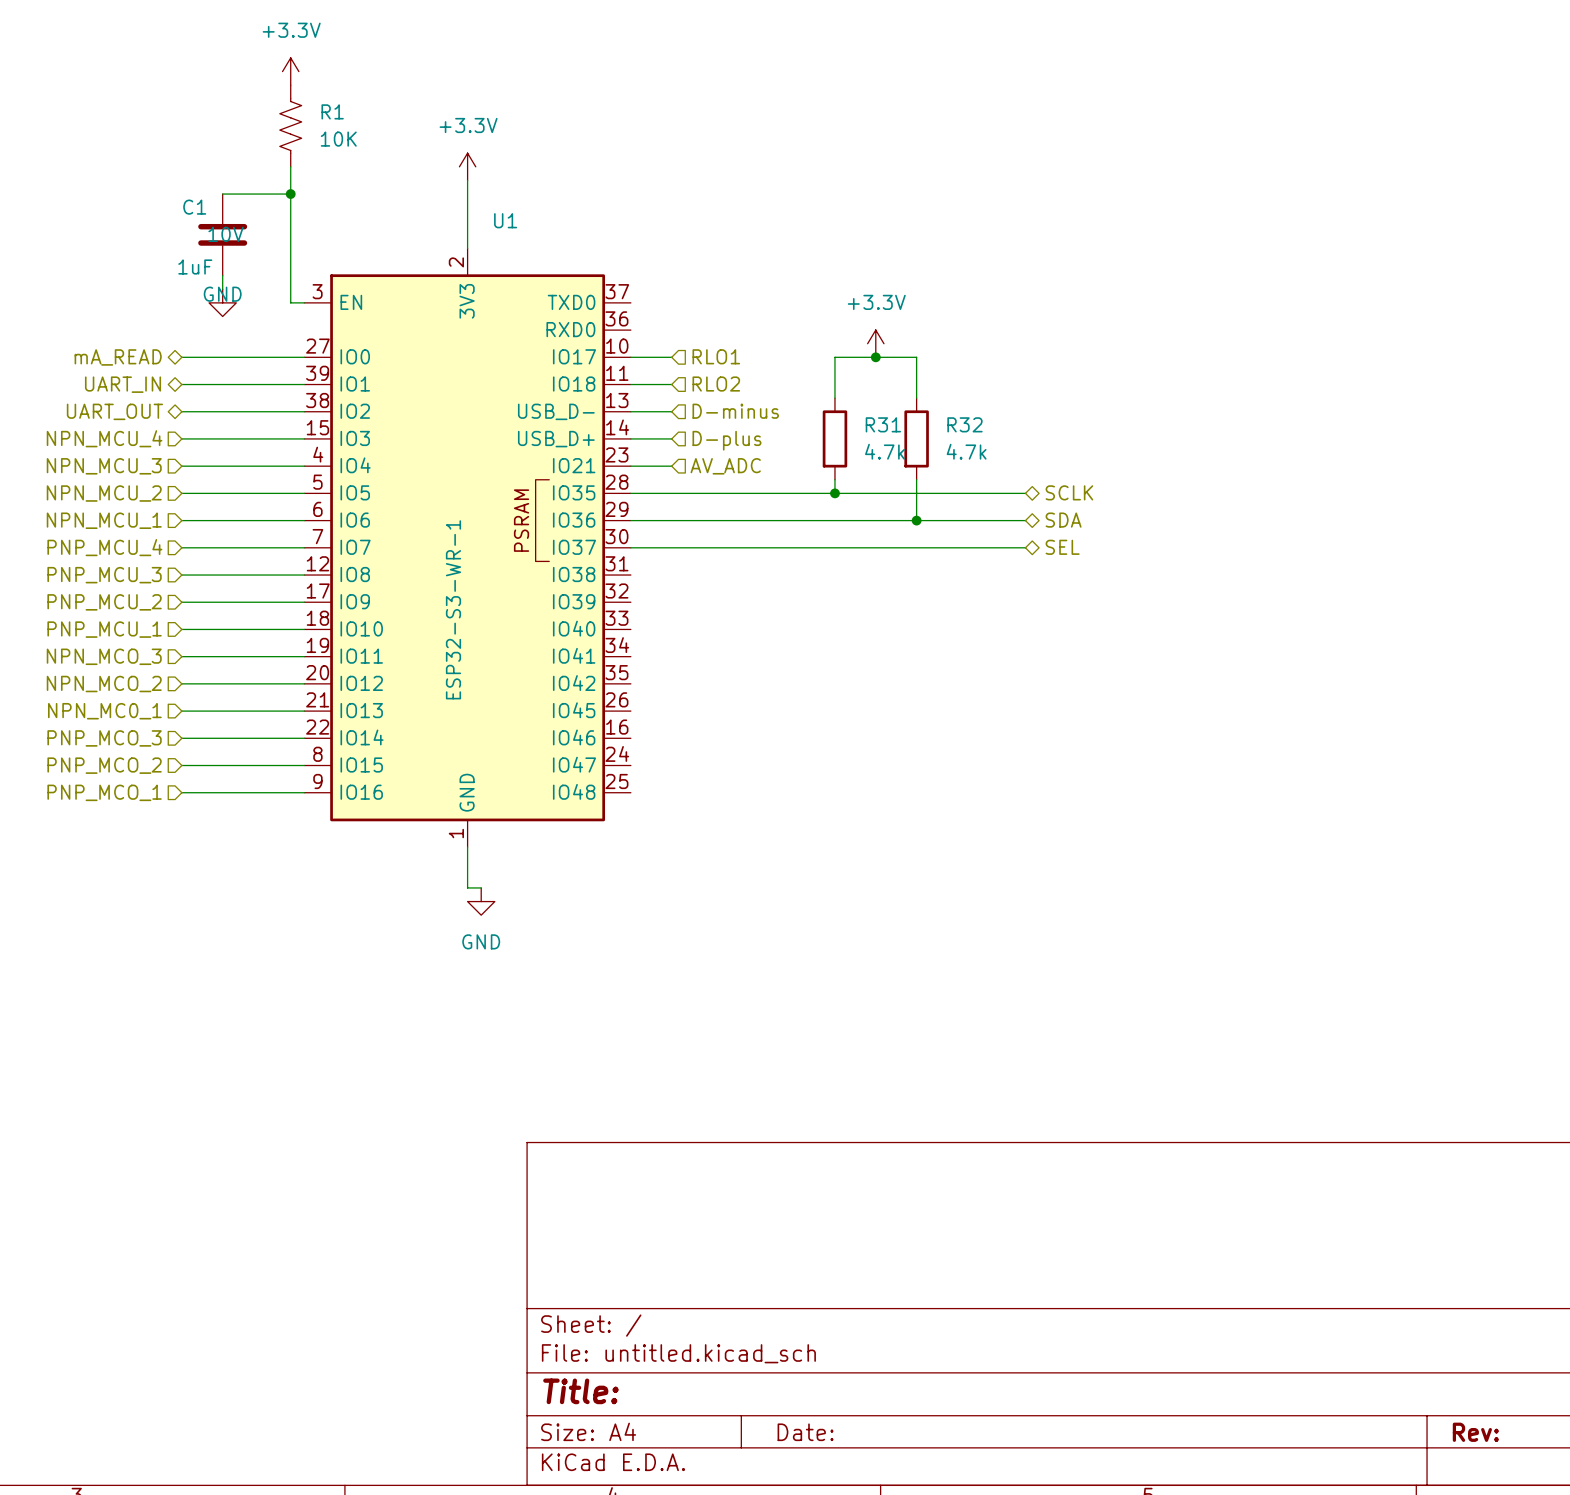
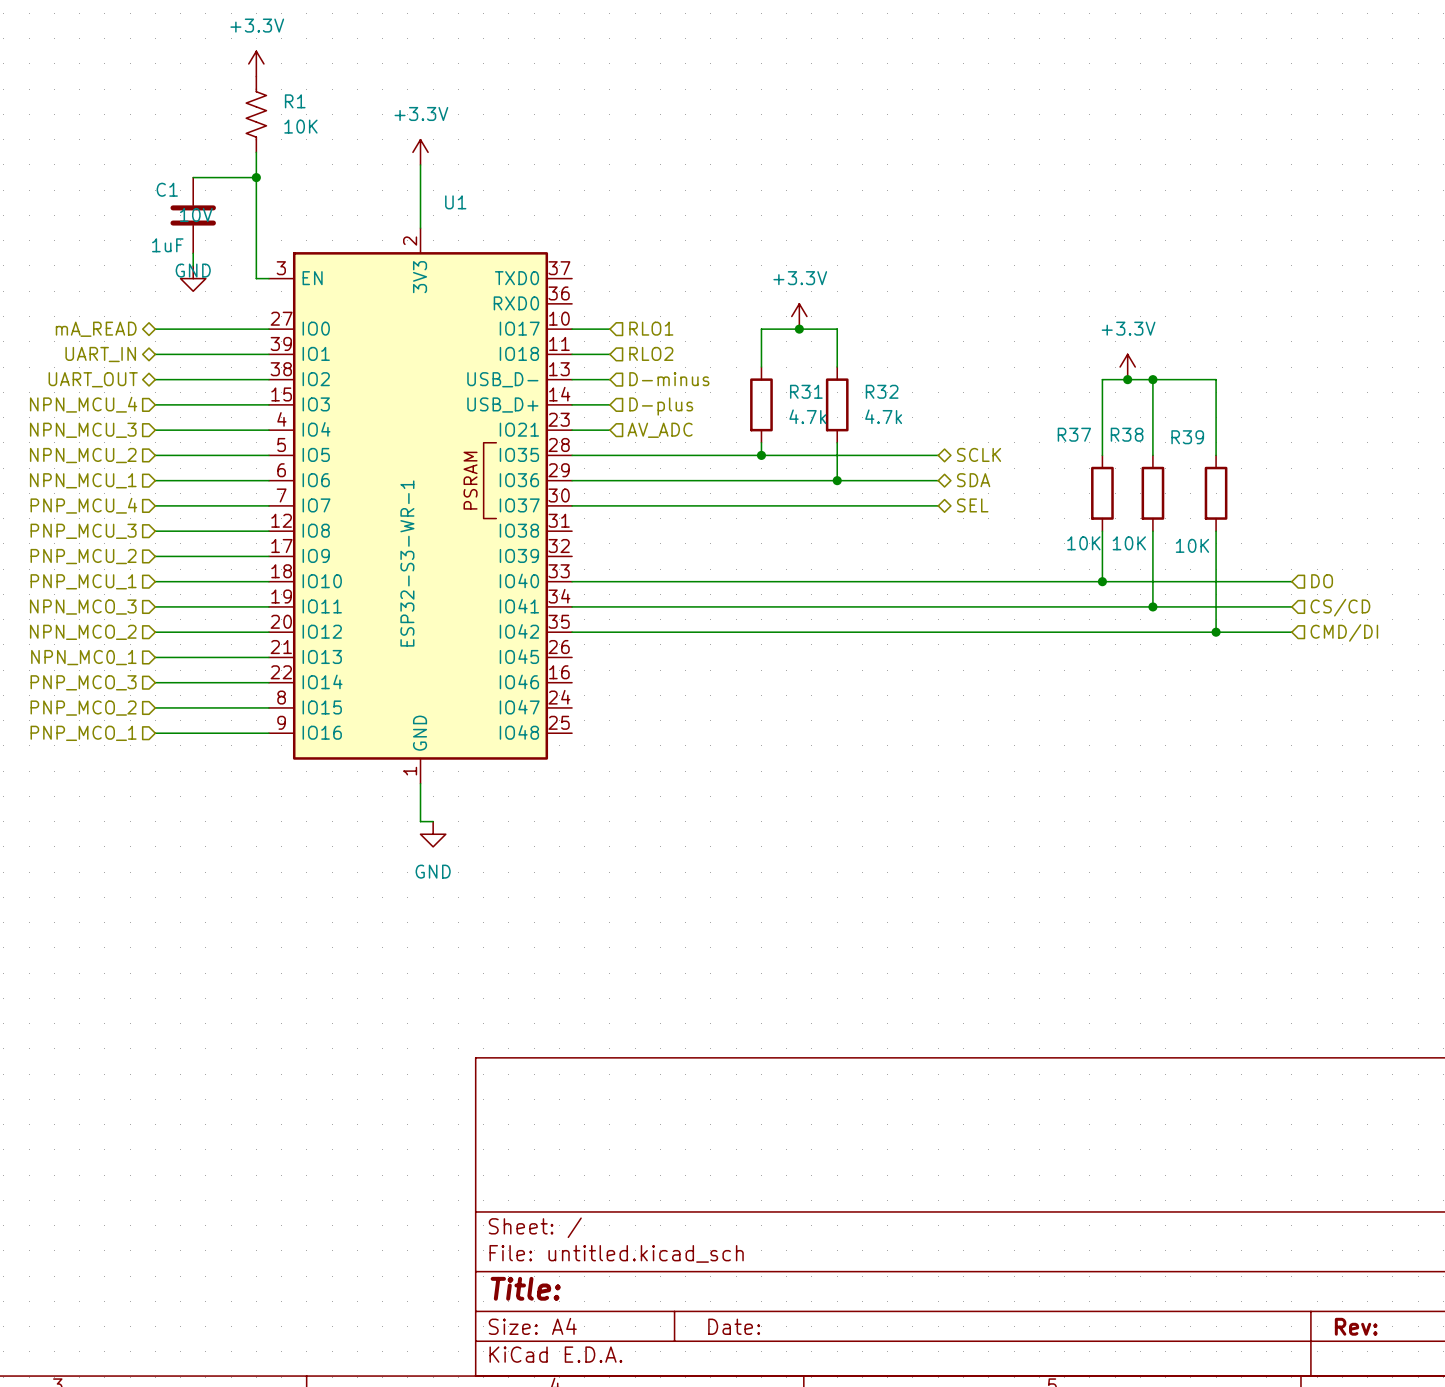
power symbol: none -> +3.3V (1127, 367)
junction: none -> (1127, 379)
wire: none -> (1152, 379) (1152, 455)
junction: none -> (1152, 379)
wire: none -> (1102, 455) (1102, 379) (1216, 379) (1216, 455)
R37: none -> 10K (1102, 493)
R38: none -> 10K (1152, 493)
R39: none -> 10K (1216, 493)
wire: none -> (1102, 531) (1102, 581)
wire: none -> (1152, 531) (1152, 606)
wire: none -> (1216, 531) (1216, 632)
hierarchical label: none -> DO (1322, 581)
wire: none -> (572, 581) (1291, 581)
junction: none -> (1102, 581)
wire: none -> (572, 606) (1291, 606)
junction: none -> (1152, 606)
hierarchical label: none -> CS/CD (1340, 607)
wire: none -> (572, 632) (1291, 632)
junction: none -> (1216, 632)
hierarchical label: none -> CMD/DI (1344, 632)

